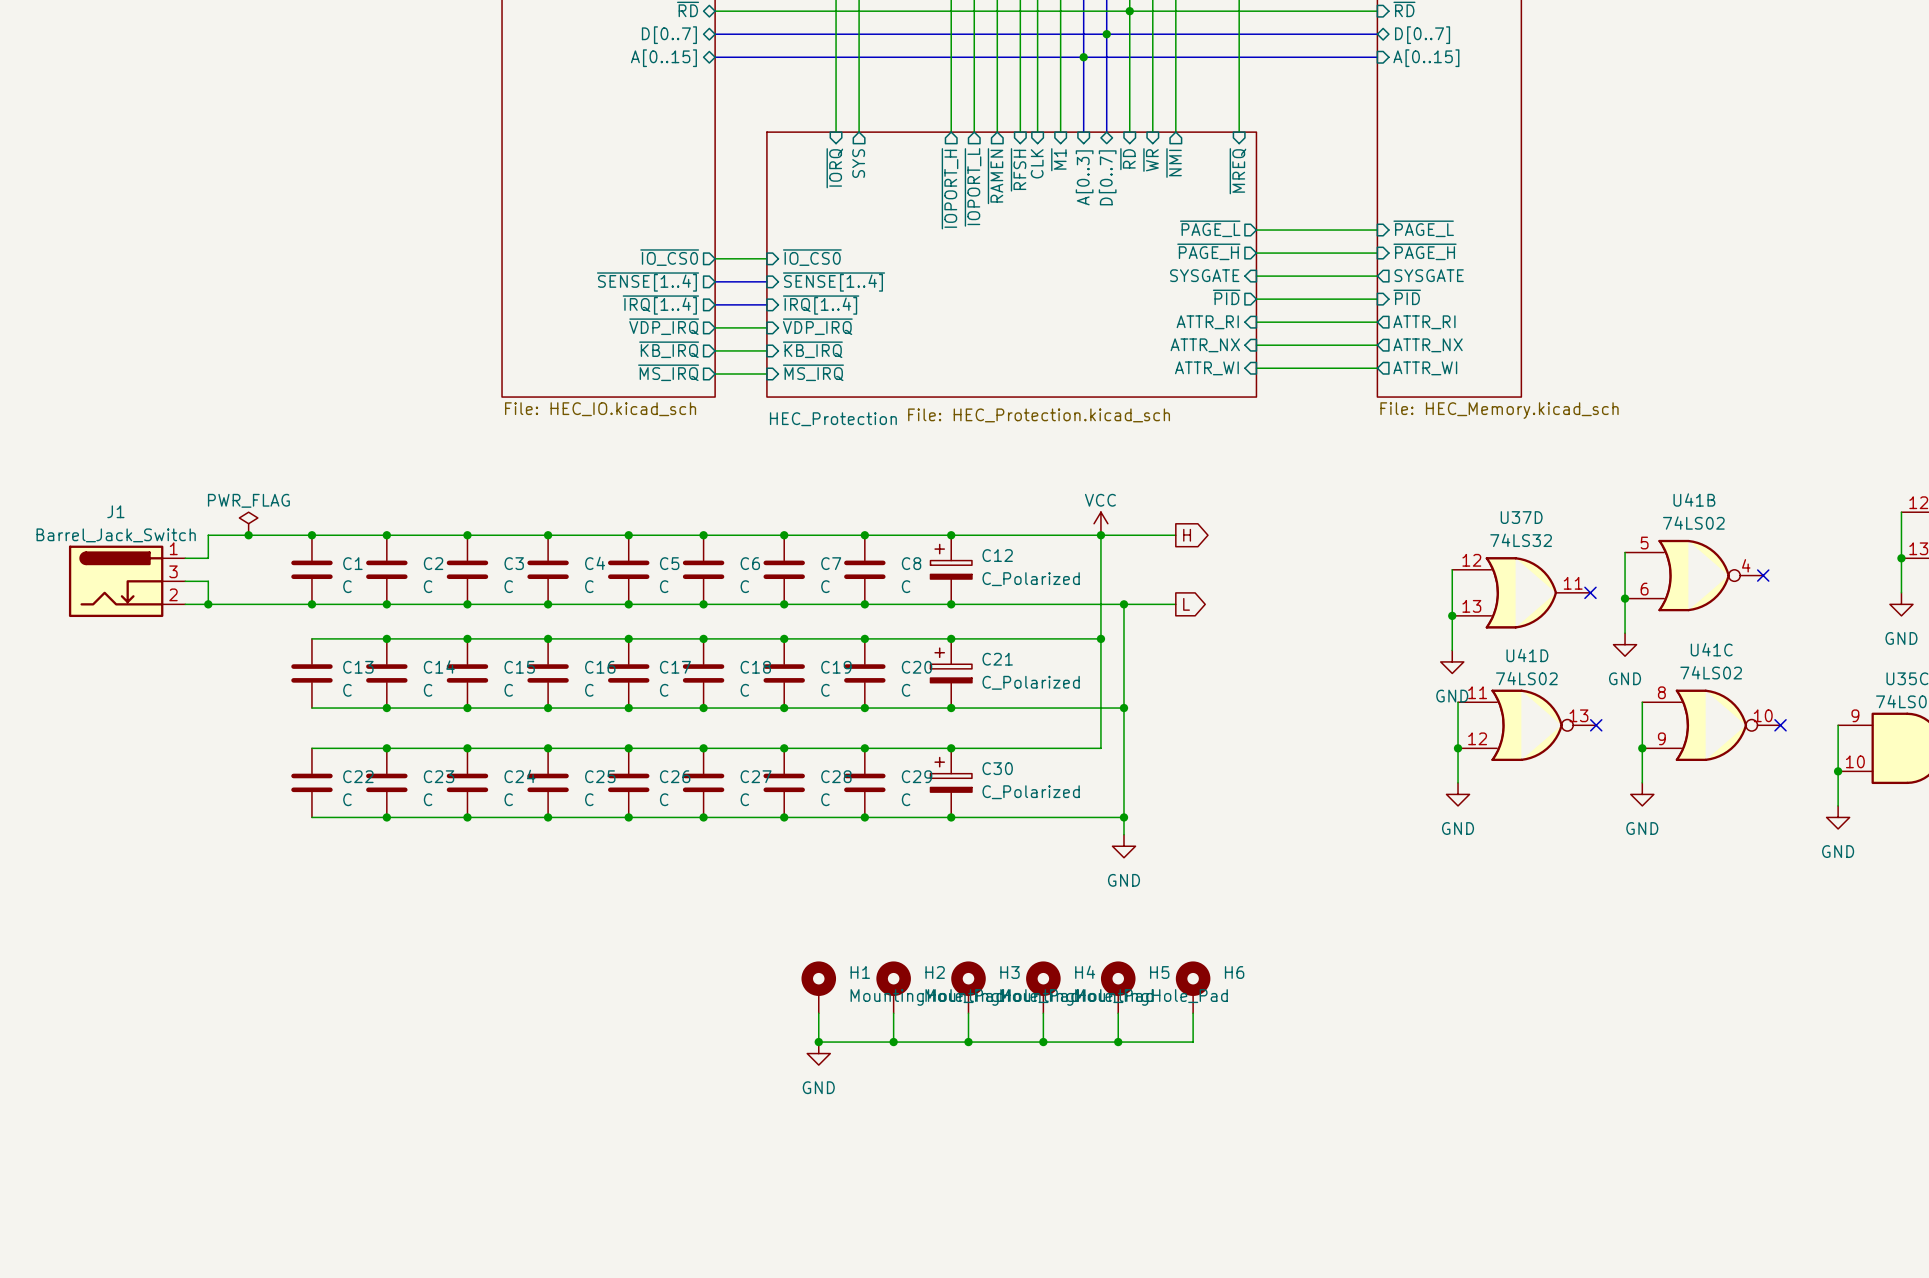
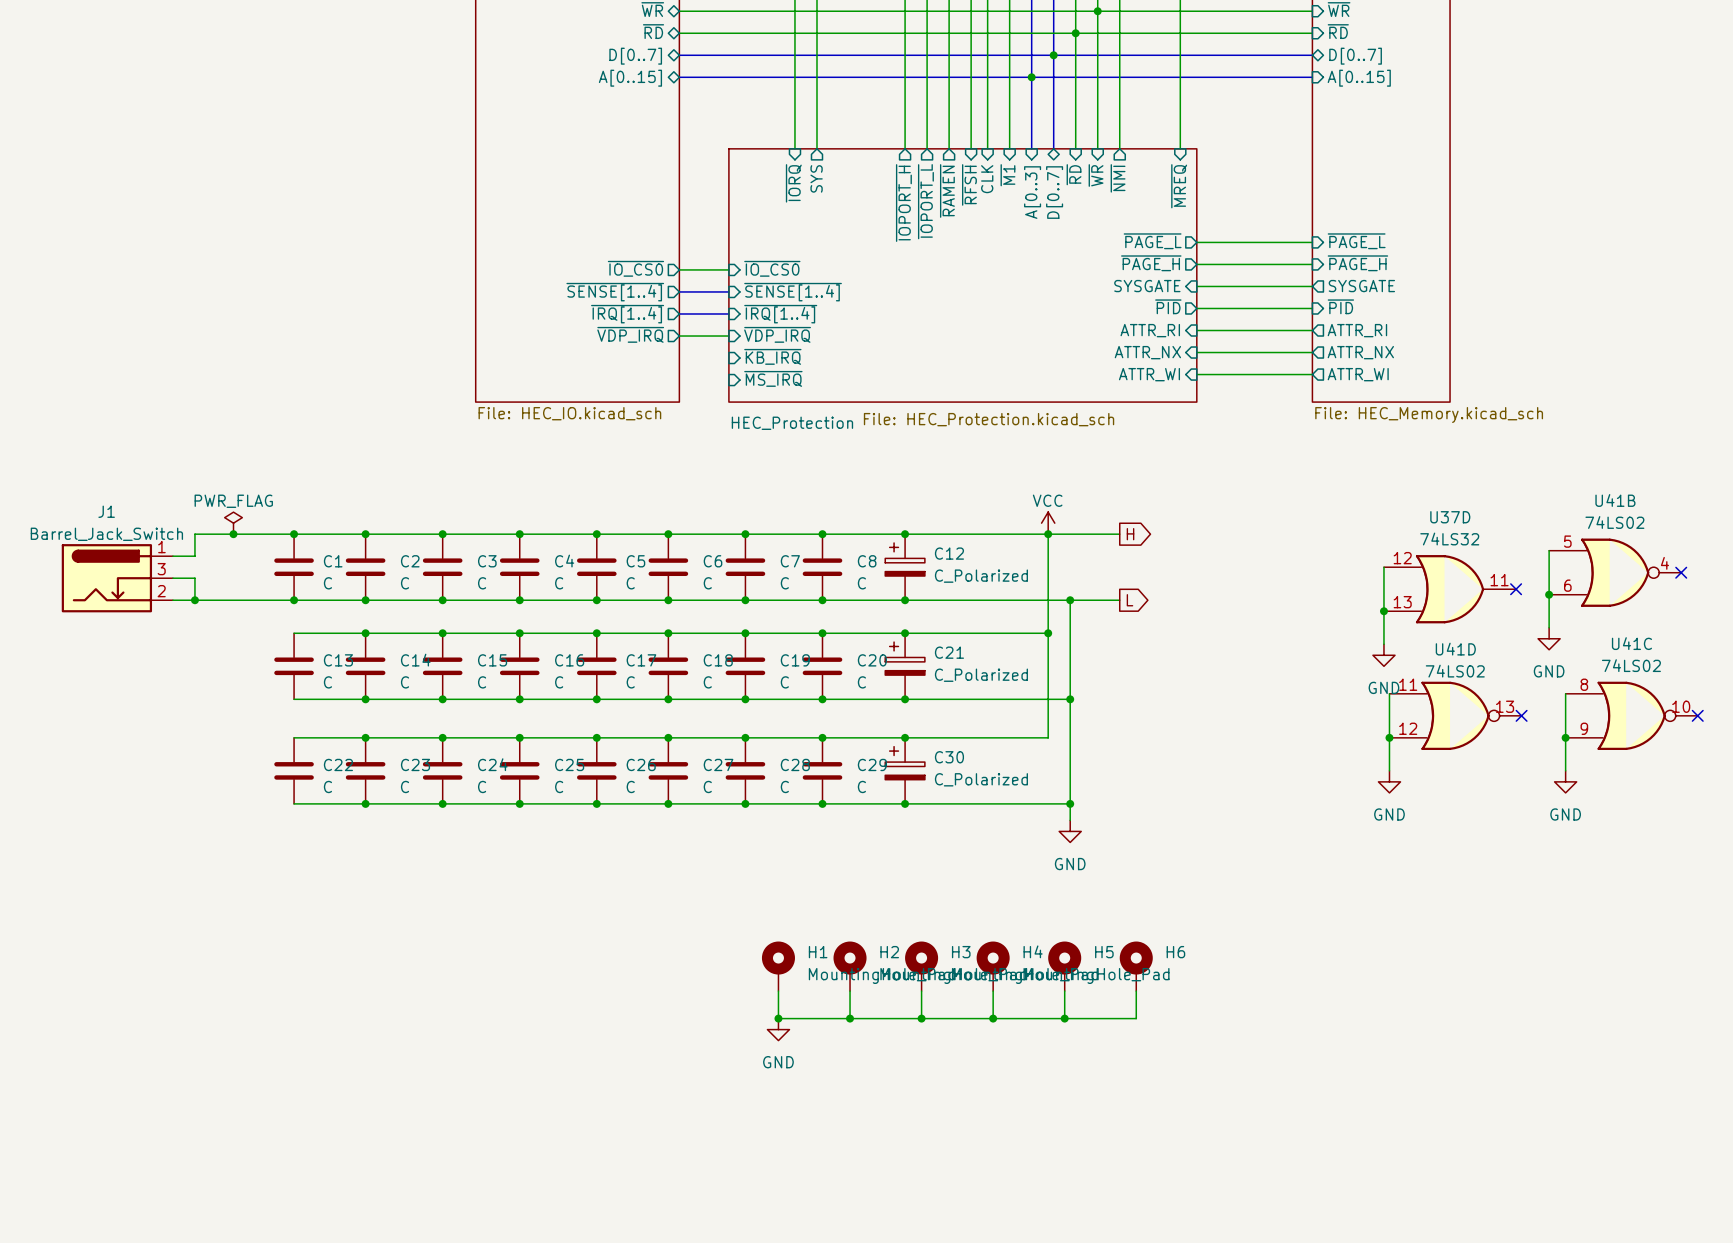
sheet pin: ~{KB_IRQ} (669, 349) -> none
wire: (715, 350) (766, 350) -> none
sheet pin: ~{MS_IRQ} (668, 372) -> none
wire: (715, 373) (766, 373) -> none

